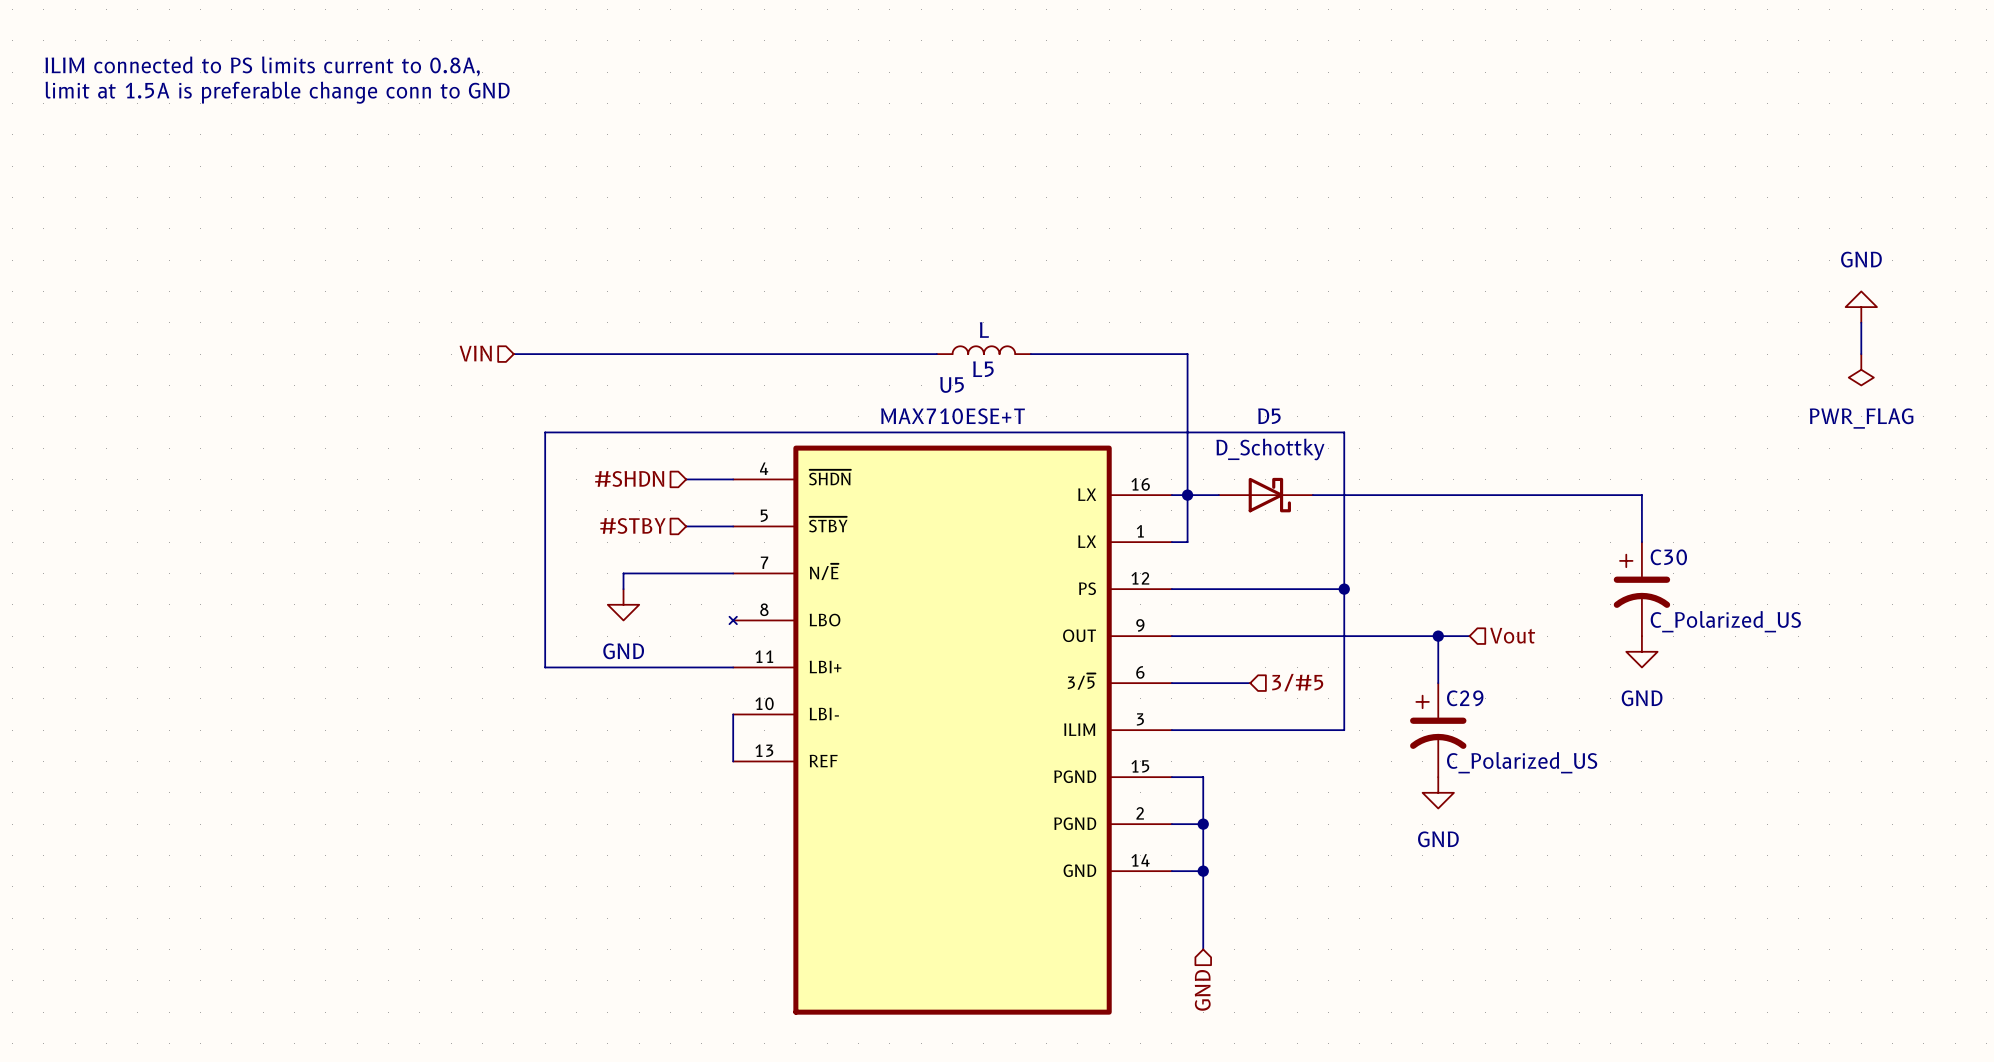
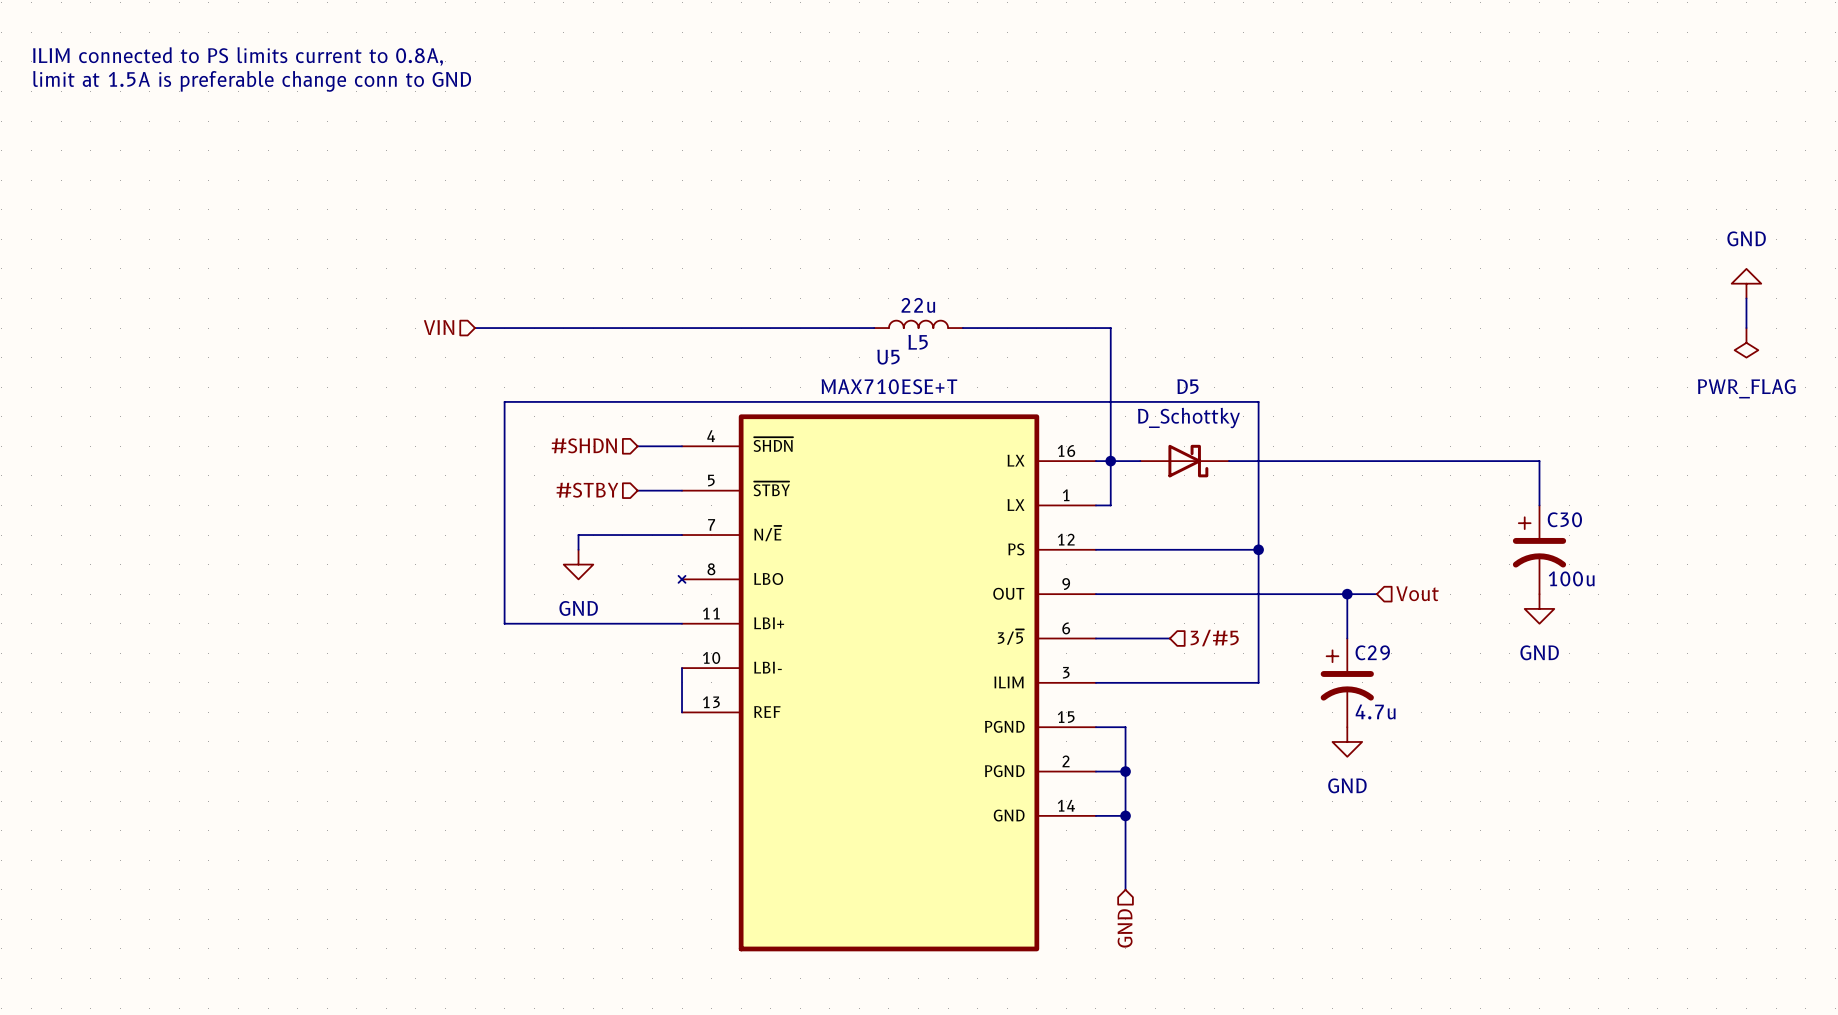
L5 value: L (984, 330) -> 22u (918, 305)
C30 value: C_Polarized_US (1725, 621) -> 100u (1571, 578)
C29 value: C_Polarized_US (1522, 762) -> 4.7u (1375, 711)

